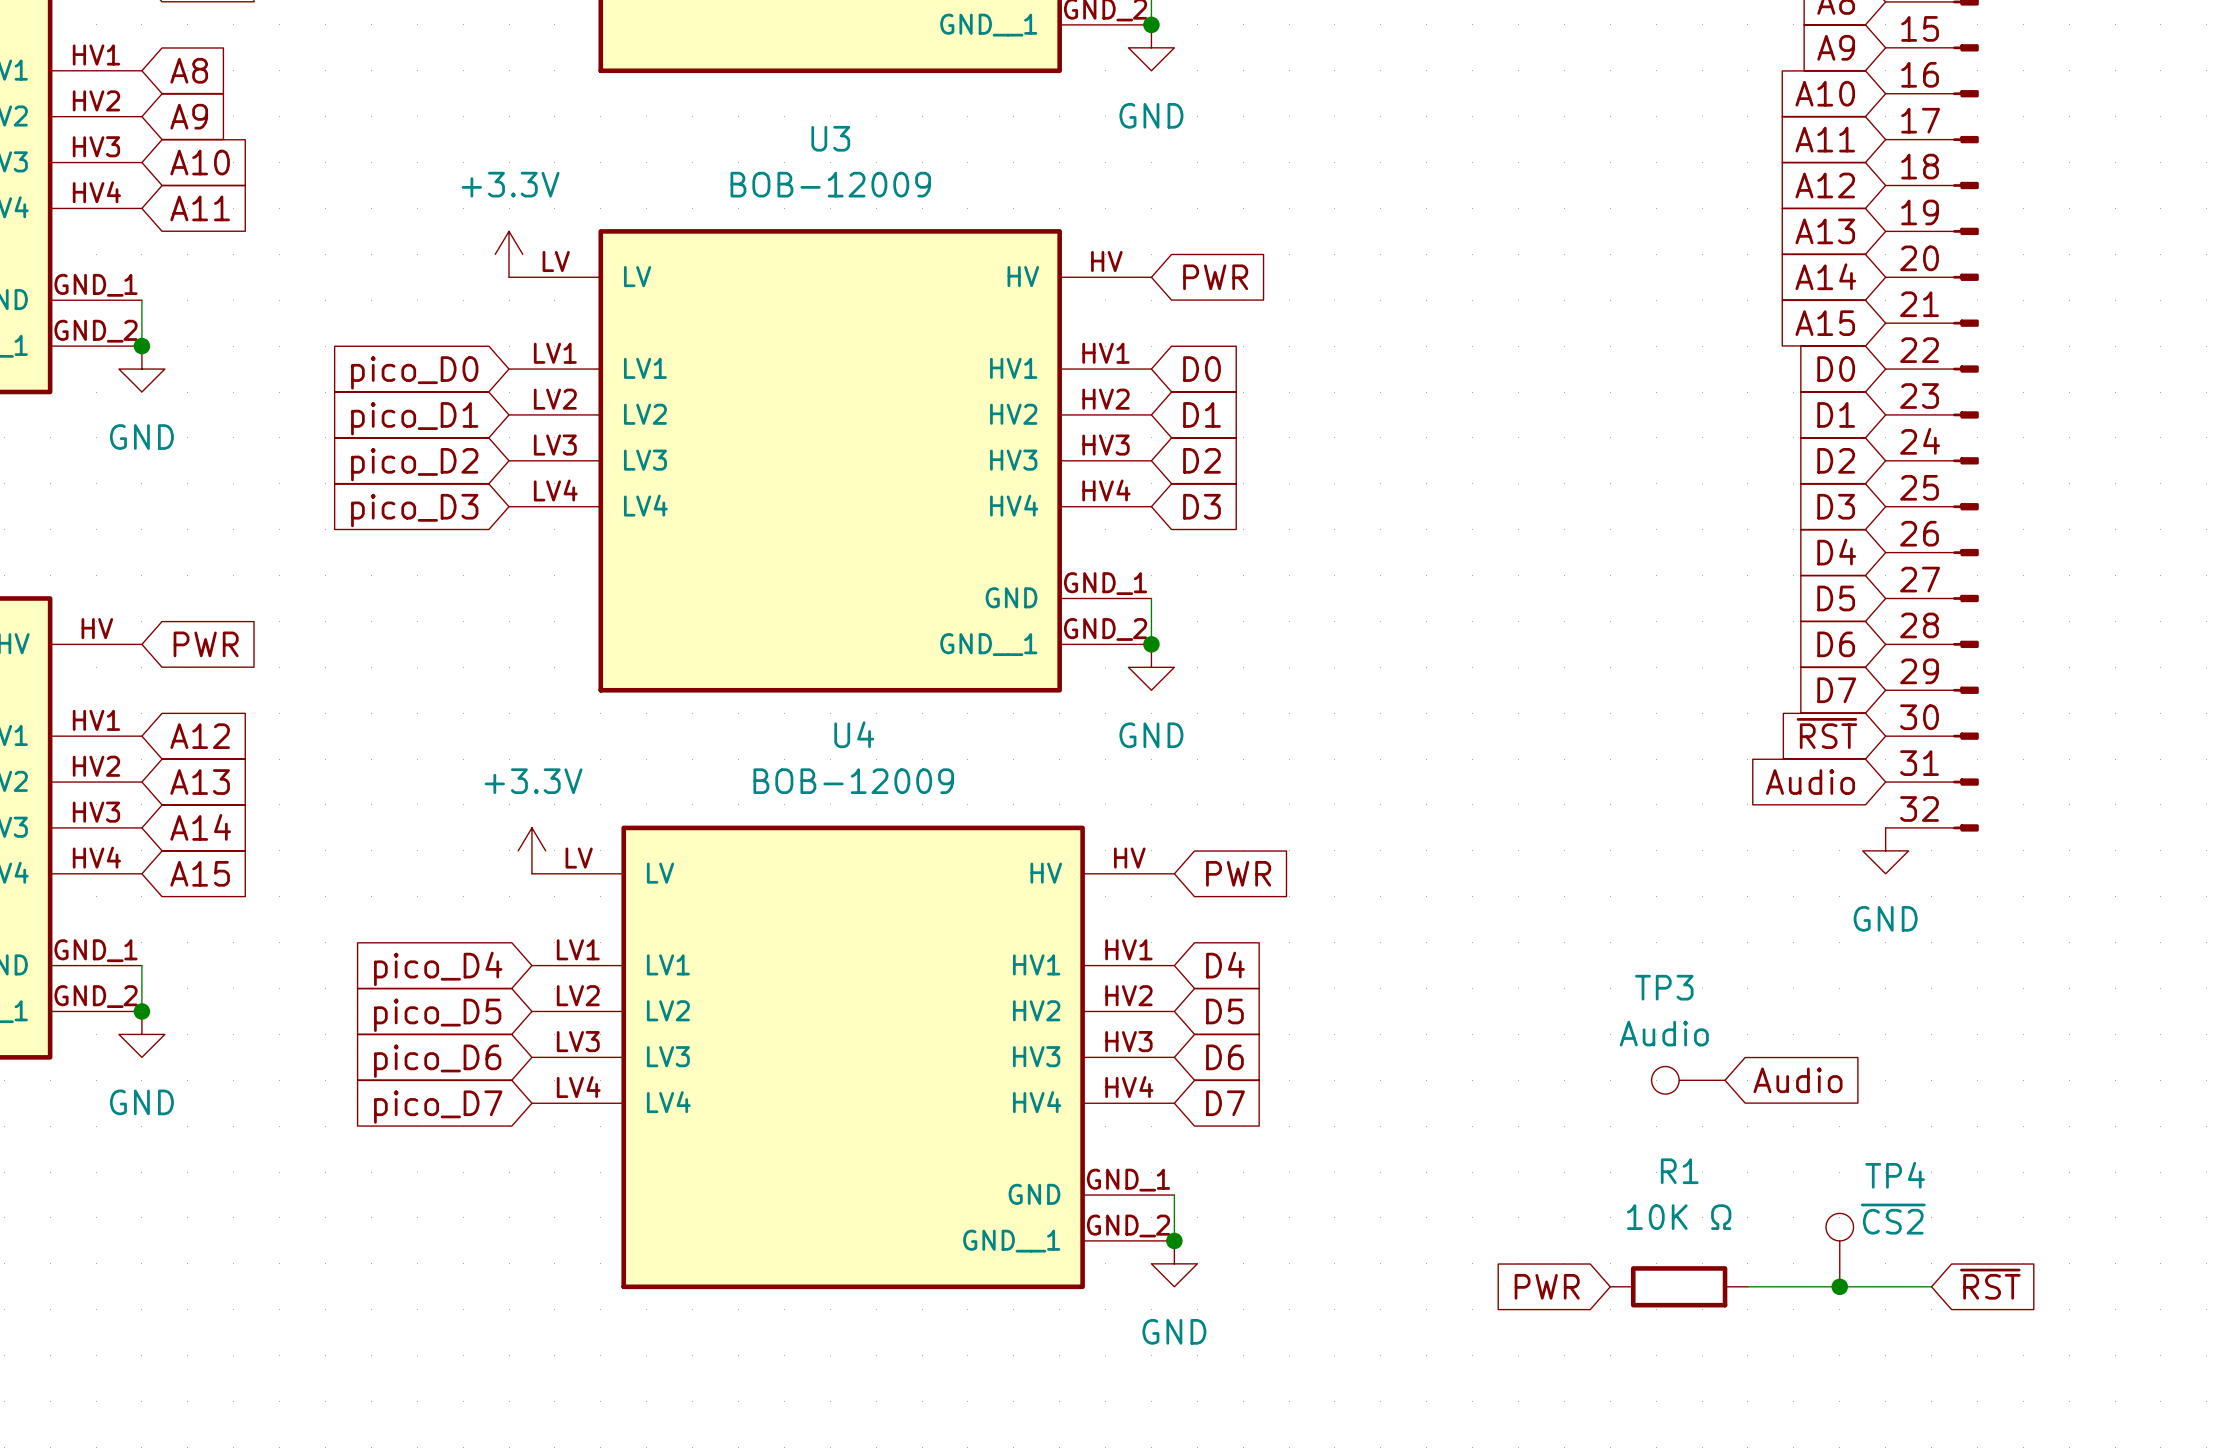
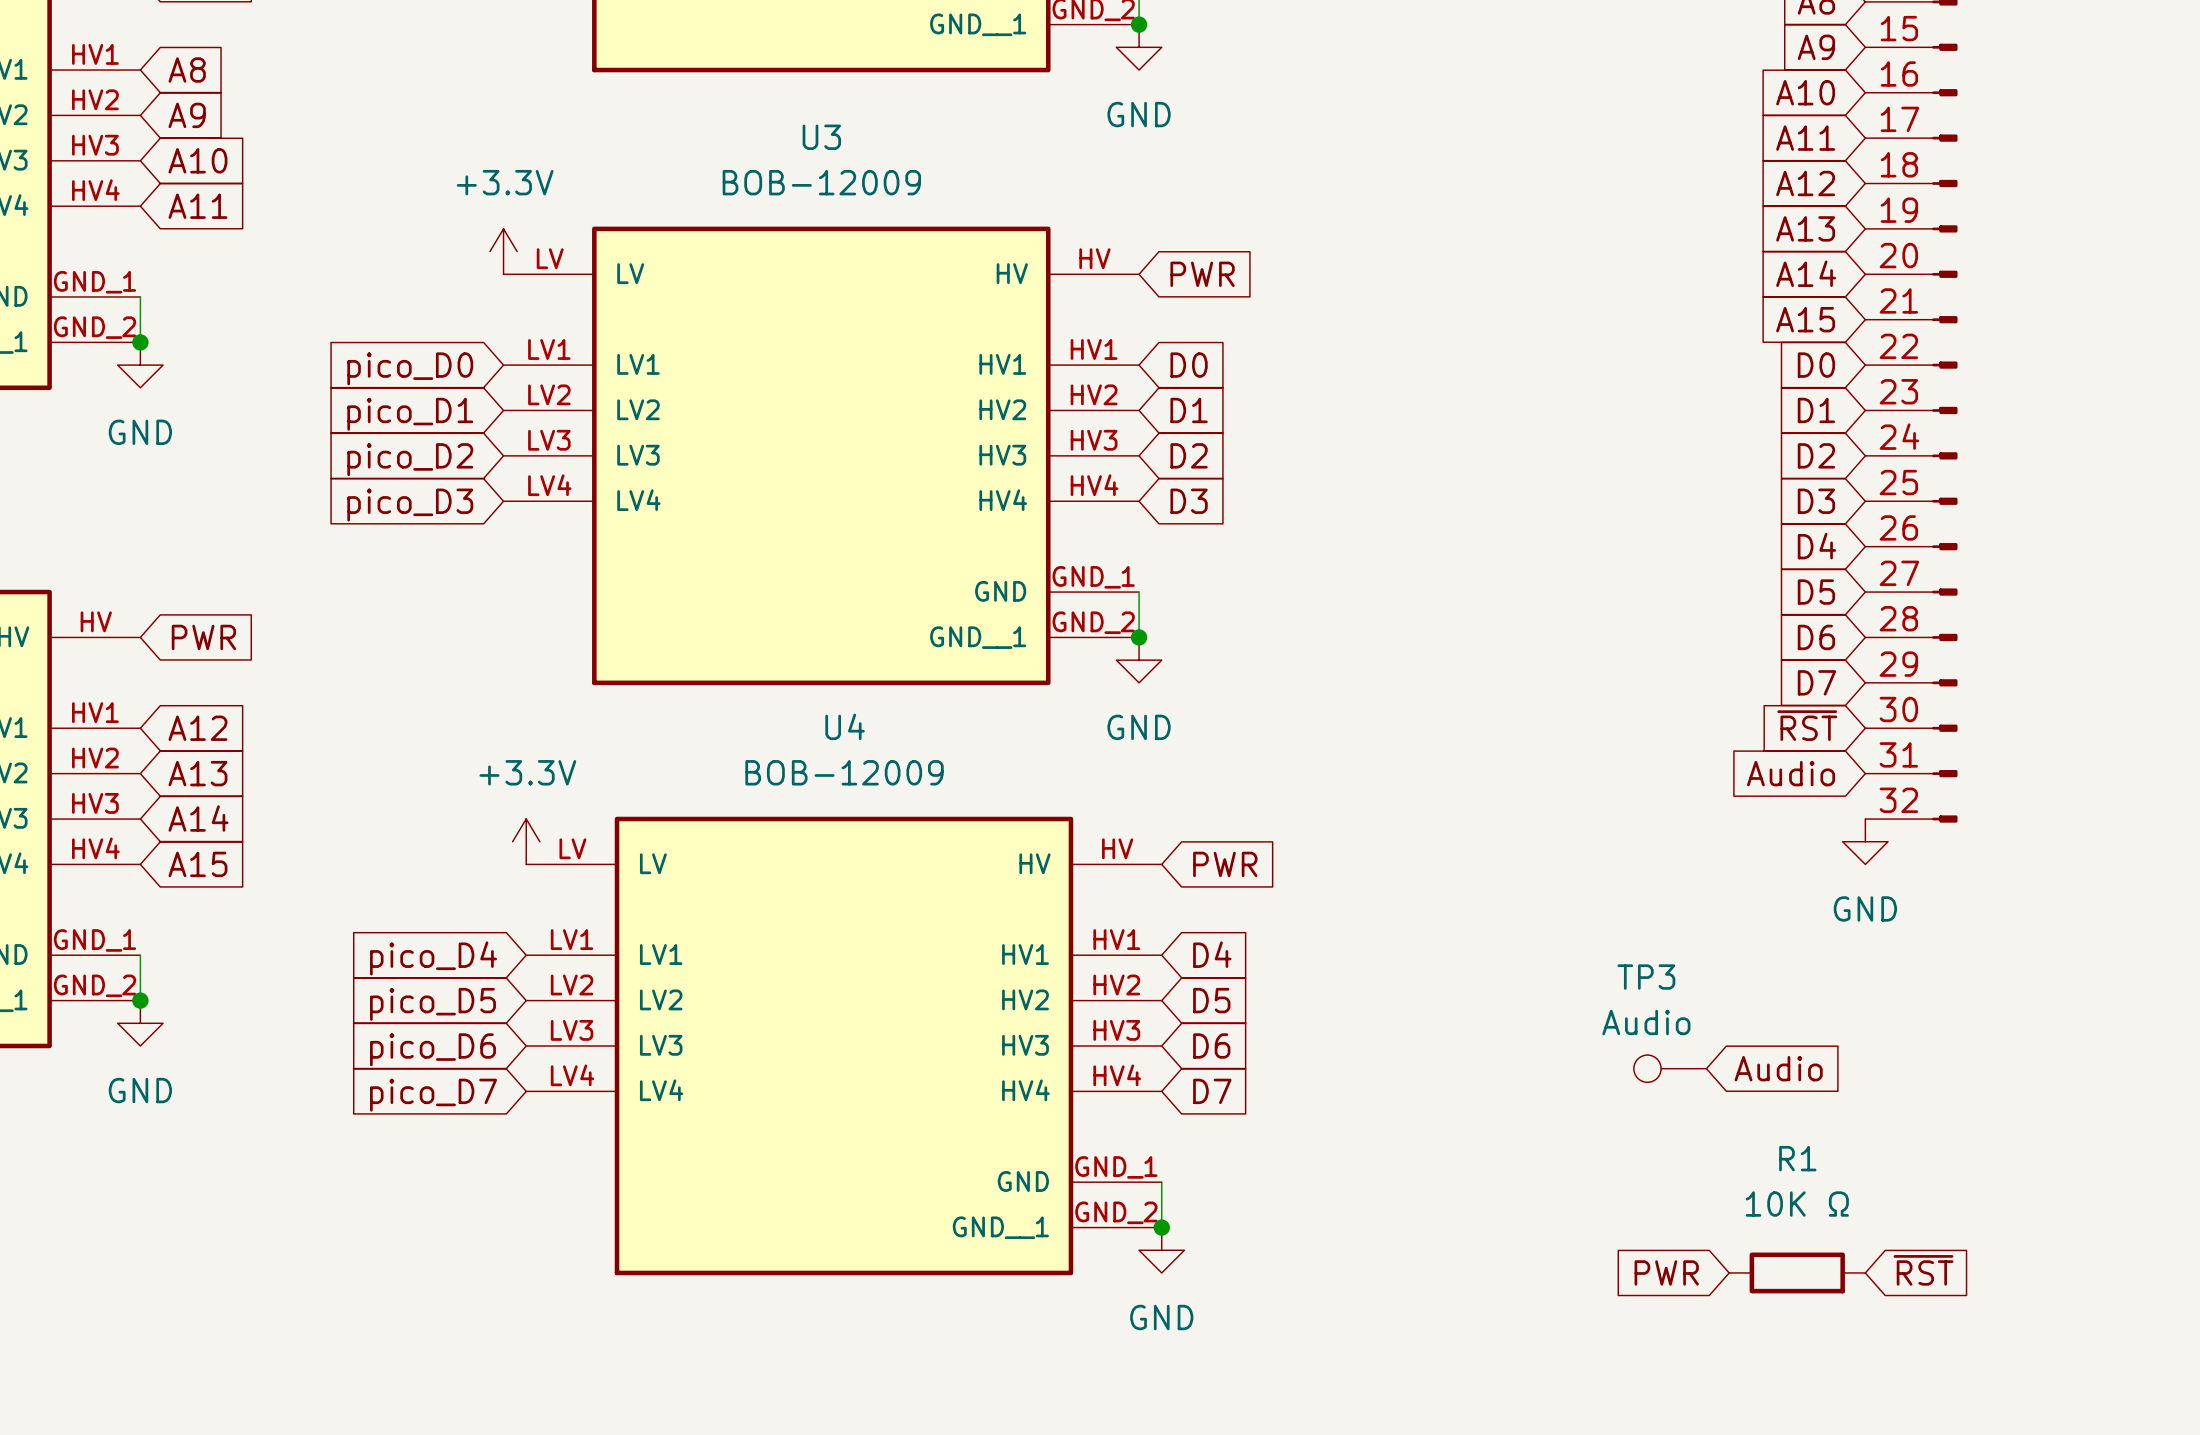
TP4: ~{CS2} (1839, 1250) -> none
global label position: ~{RST} (1990, 1284) -> ~{RST} (1923, 1270)
global label position: PWR (1547, 1286) -> PWR (1666, 1272)
R1 position: (1679, 1286) -> (1797, 1272)
wire: (1747, 1286) (1931, 1286) -> none
junction: (1839, 1286) -> none

